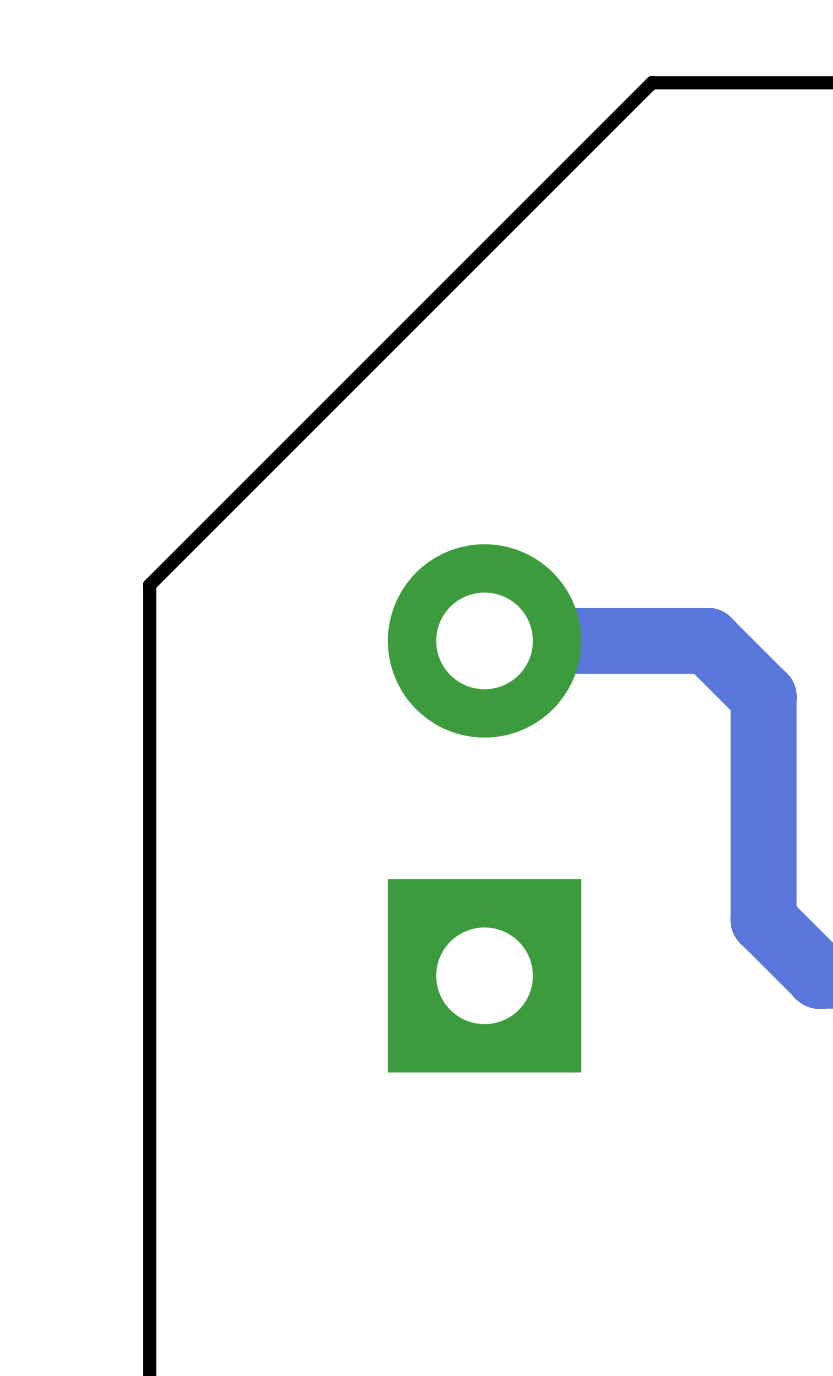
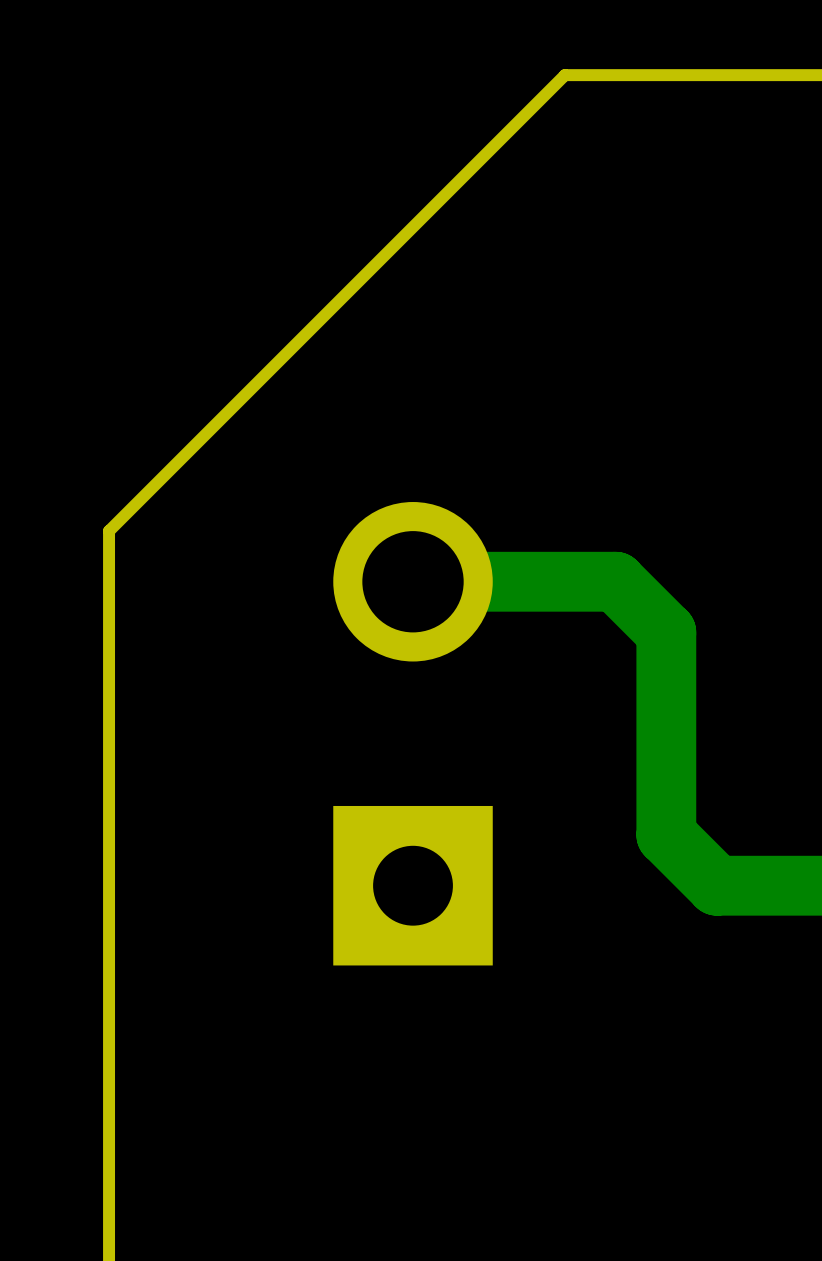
part footprint: [387, 544, 582, 1073] -> [333, 502, 493, 966]

